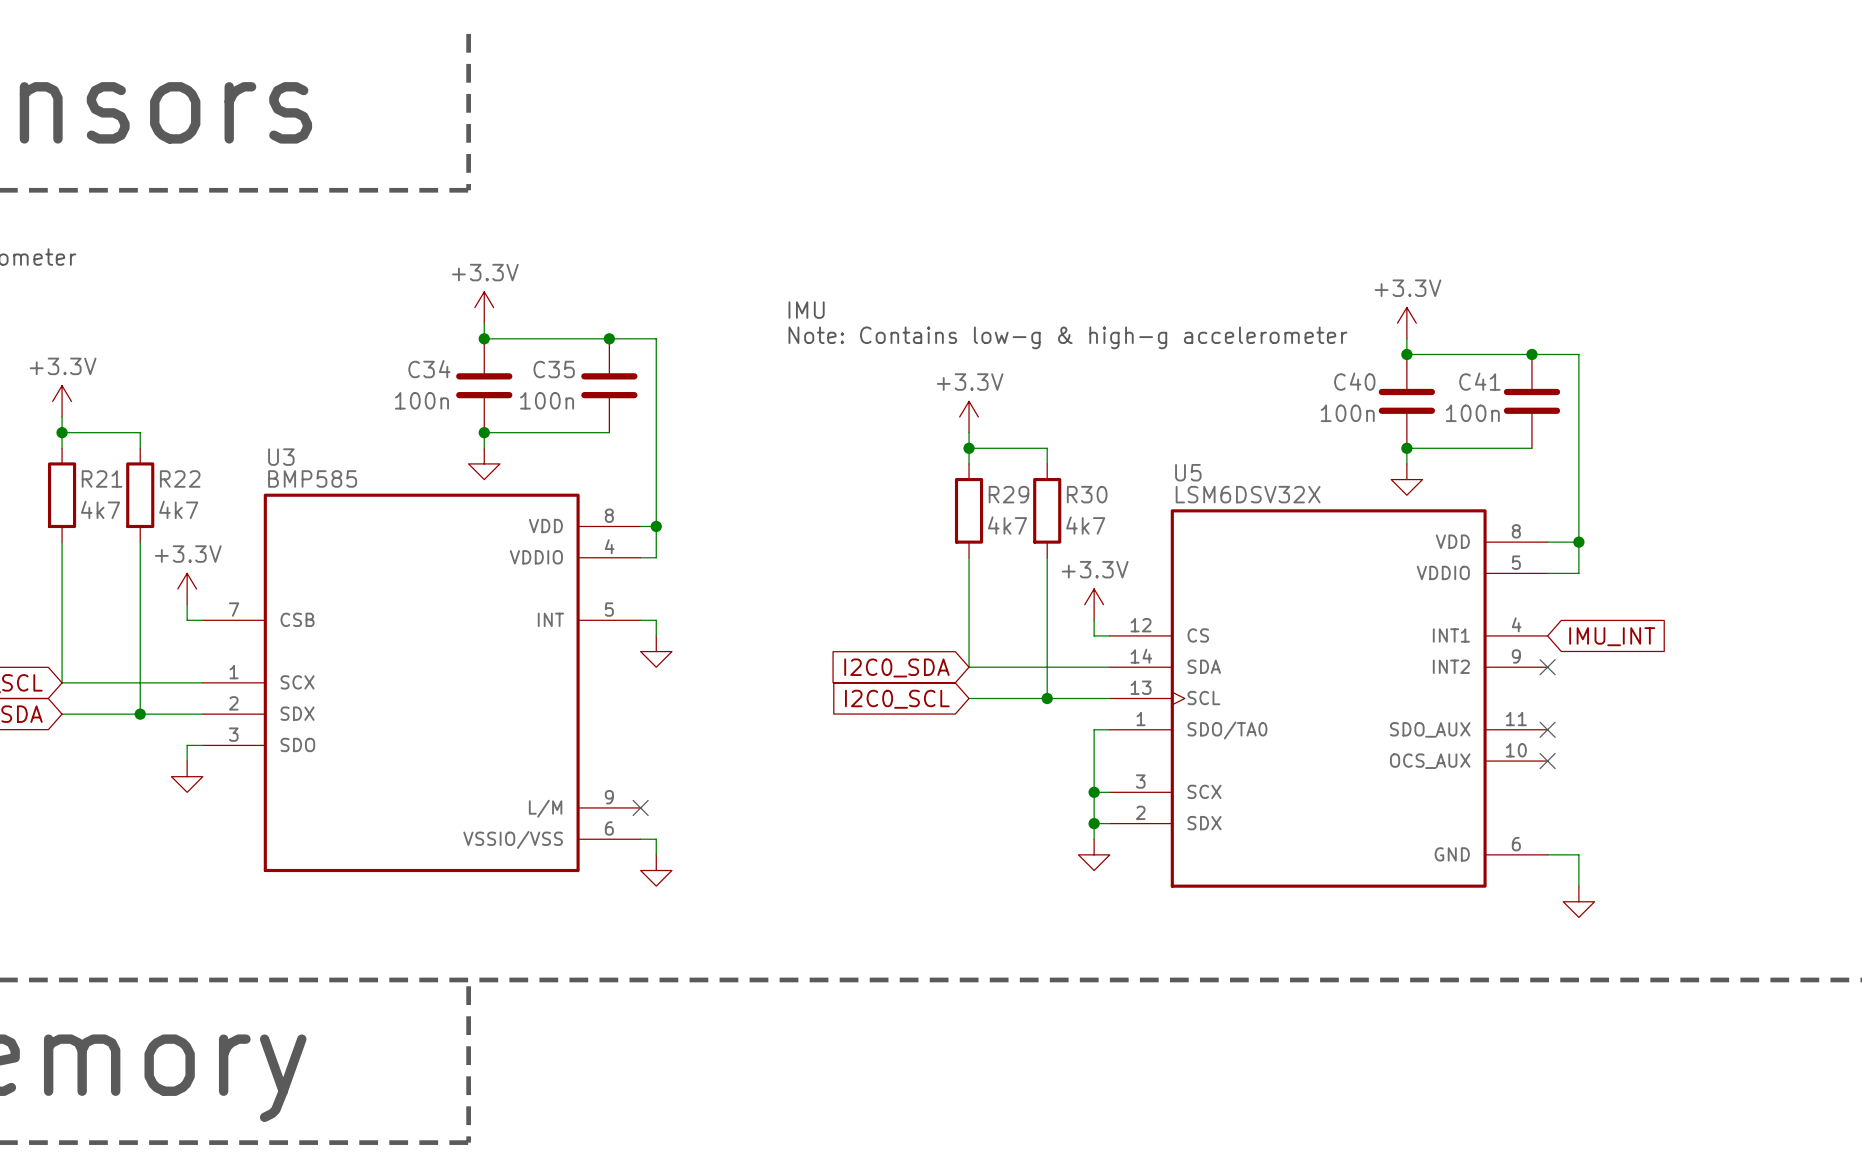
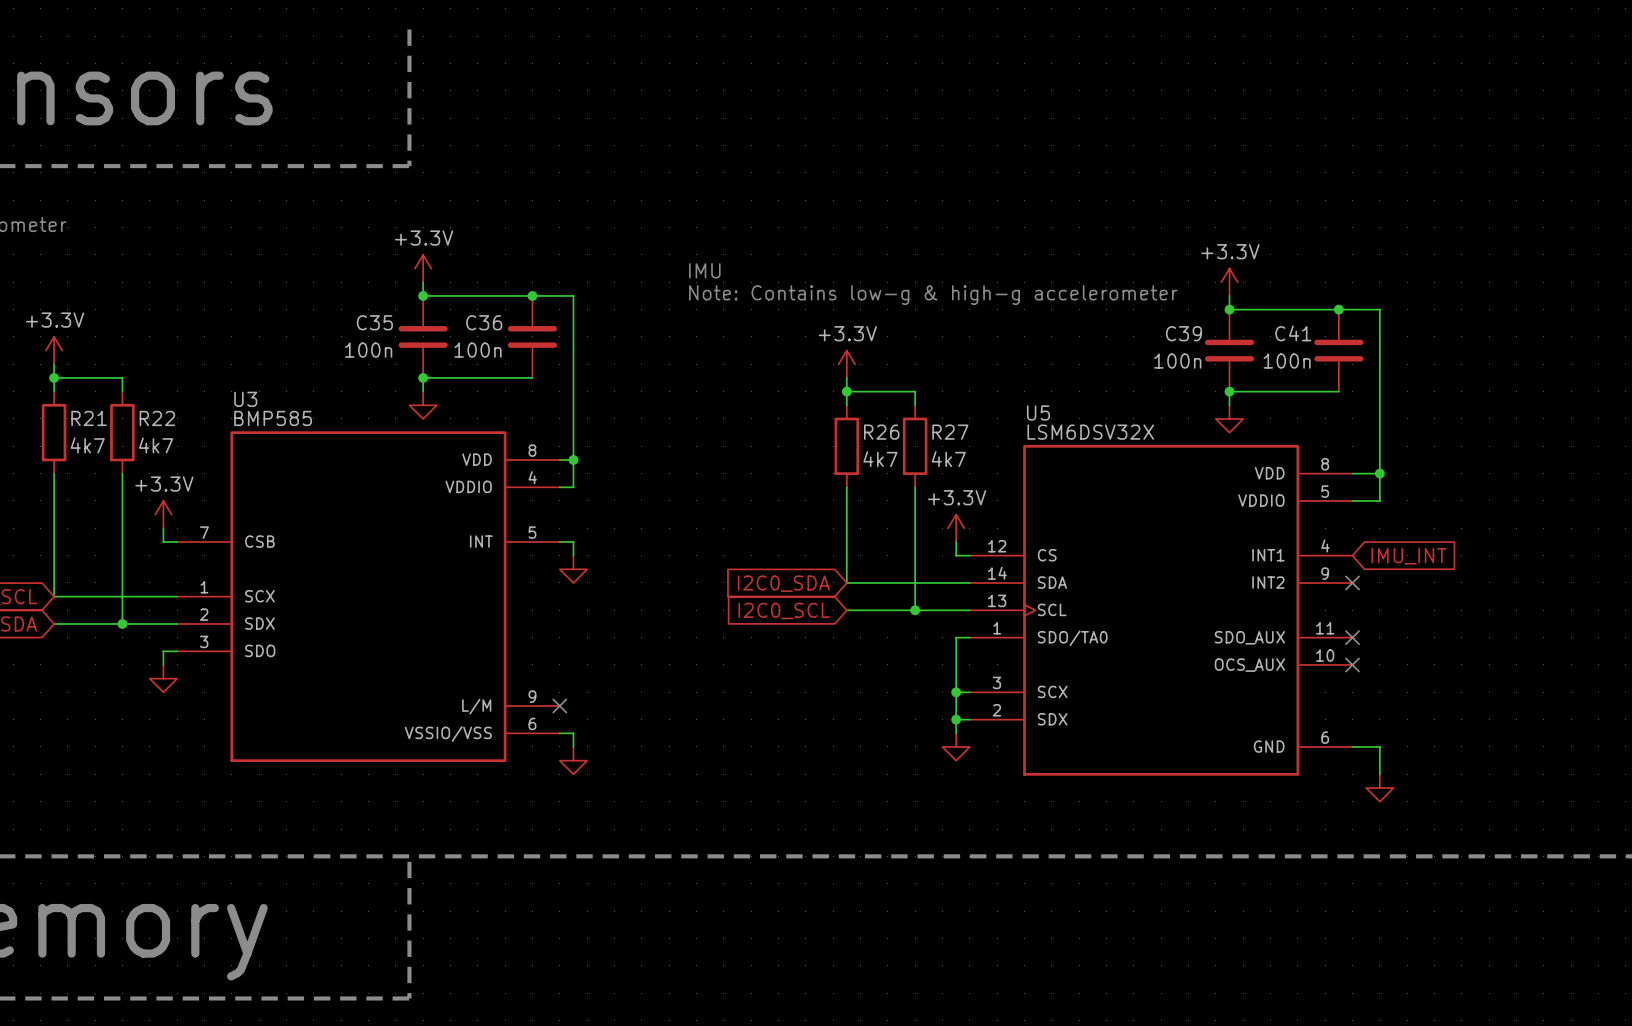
C34 name: C34 (429, 369) -> C35 (374, 322)
C35 name: C35 (554, 369) -> C36 (484, 322)
C40 name: C40 (1354, 381) -> C39 (1183, 333)
R29 name: R29 (1008, 494) -> R26 (881, 432)
R30 name: R30 (1087, 494) -> R27 (950, 432)

